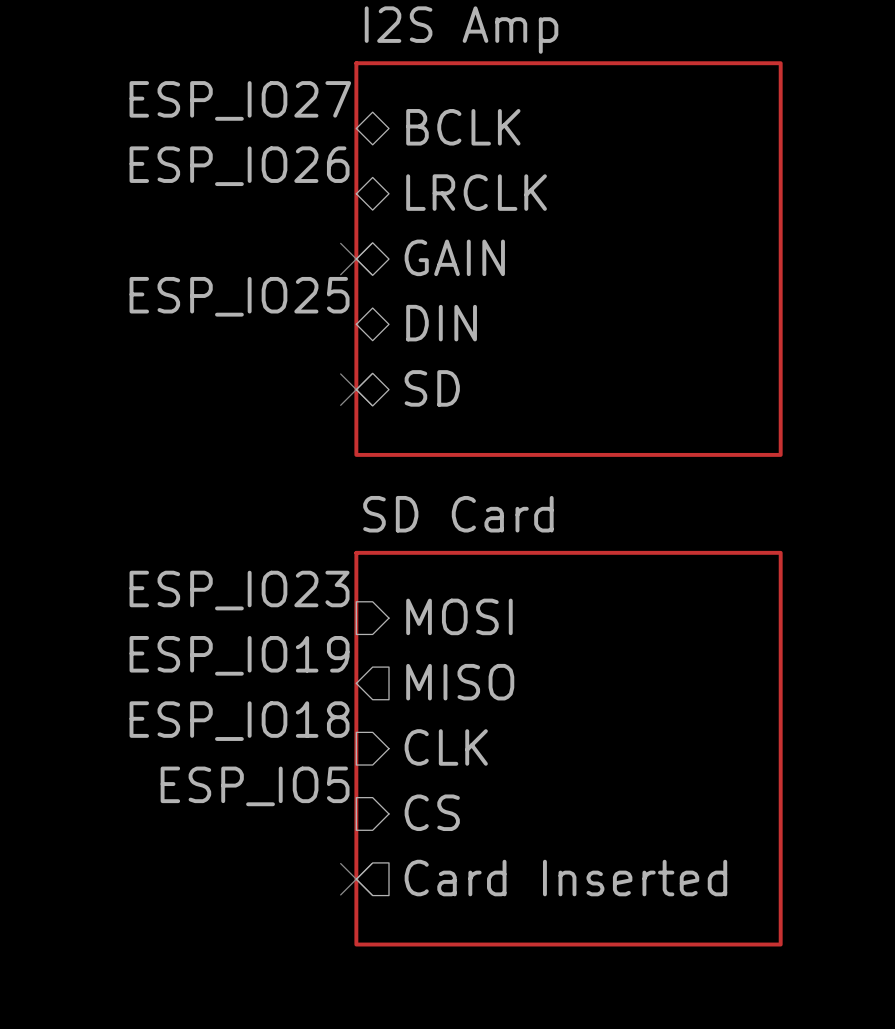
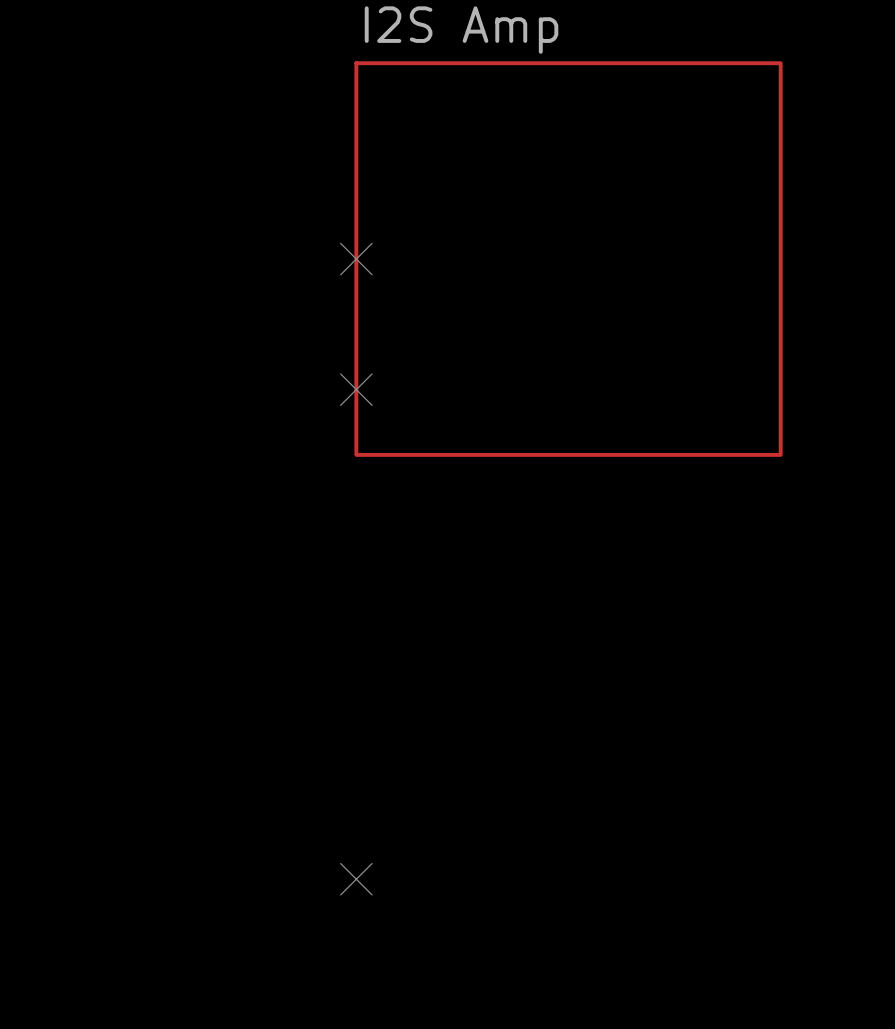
label: ESP_IO27 (240, 100) -> none
sheet pin: BCLK (463, 127) -> none
label: ESP_IO26 (239, 166) -> none
sheet pin: LRCLK (476, 192) -> none
sheet pin: GAIN (454, 257) -> none
label: ESP_IO25 (239, 296) -> none
sheet pin: DIN (441, 323) -> none
sheet pin: SD (432, 388) -> none
label: ESP_IO23 (239, 590) -> none
sheet pin: MOSI (459, 616) -> none
label: ESP_IO19 (239, 655) -> none
sheet pin: MISO (460, 682) -> none
label: ESP_IO18 (239, 721) -> none
sheet pin: CLK (446, 747) -> none
sheet SD Card: (568, 748) -> none
label: ESP_IO5 (255, 786) -> none
sheet pin: CS (432, 812) -> none
sheet pin: Card Inserted (565, 878) -> none

